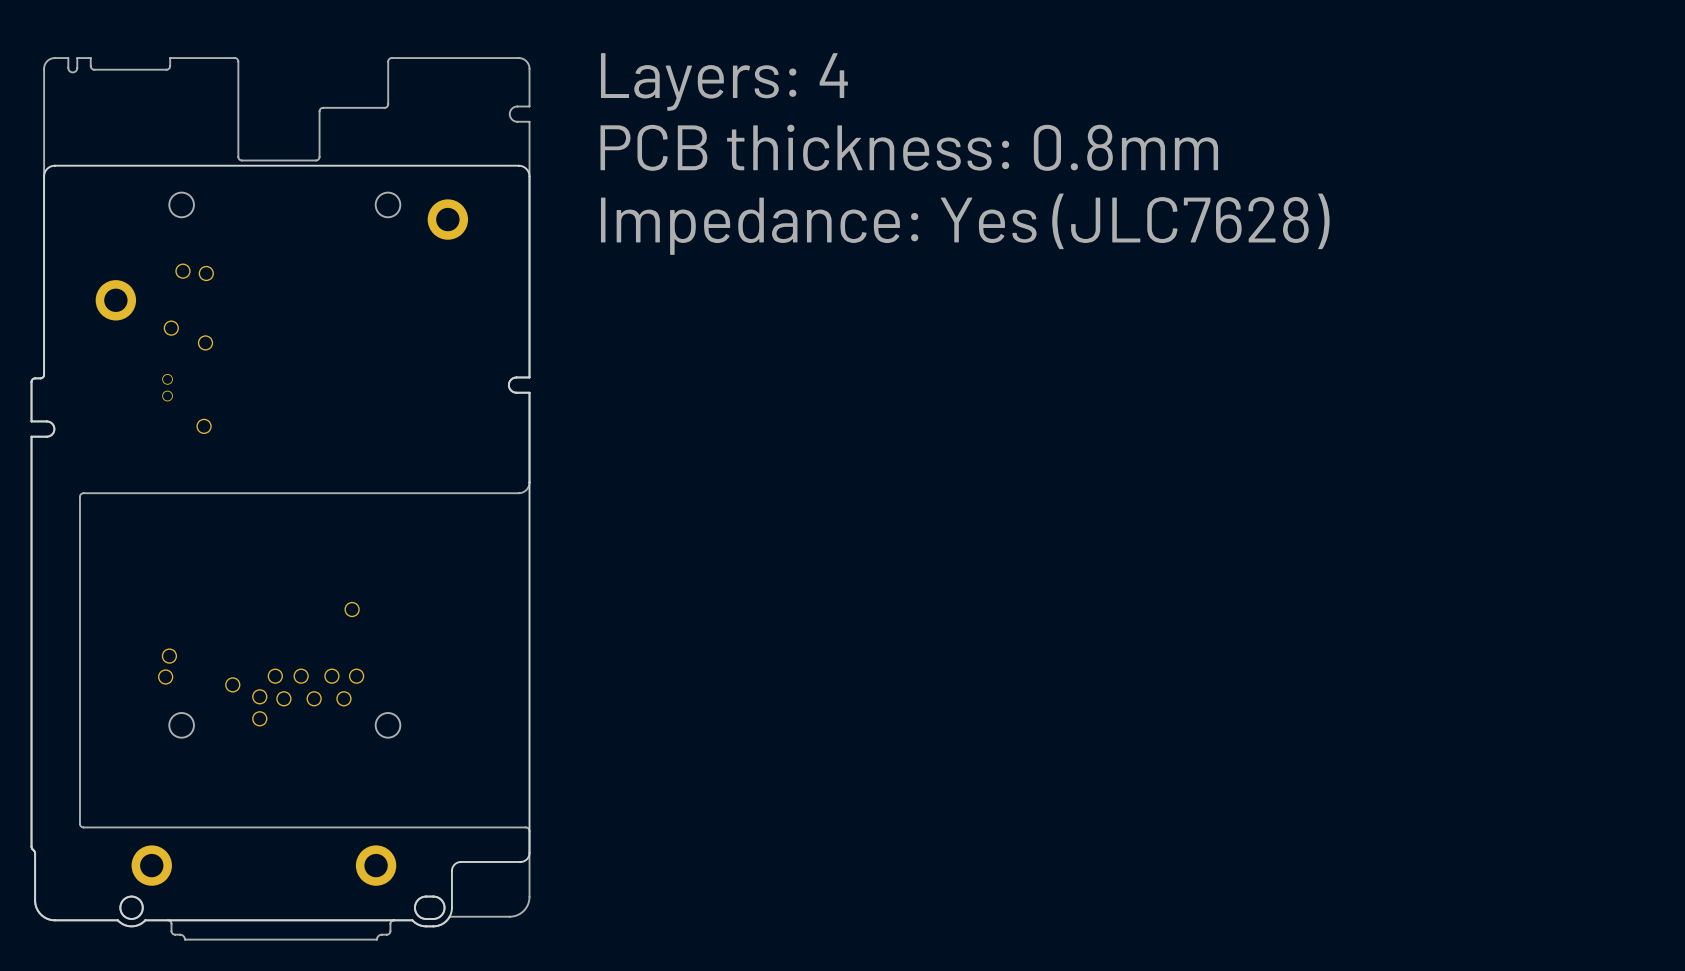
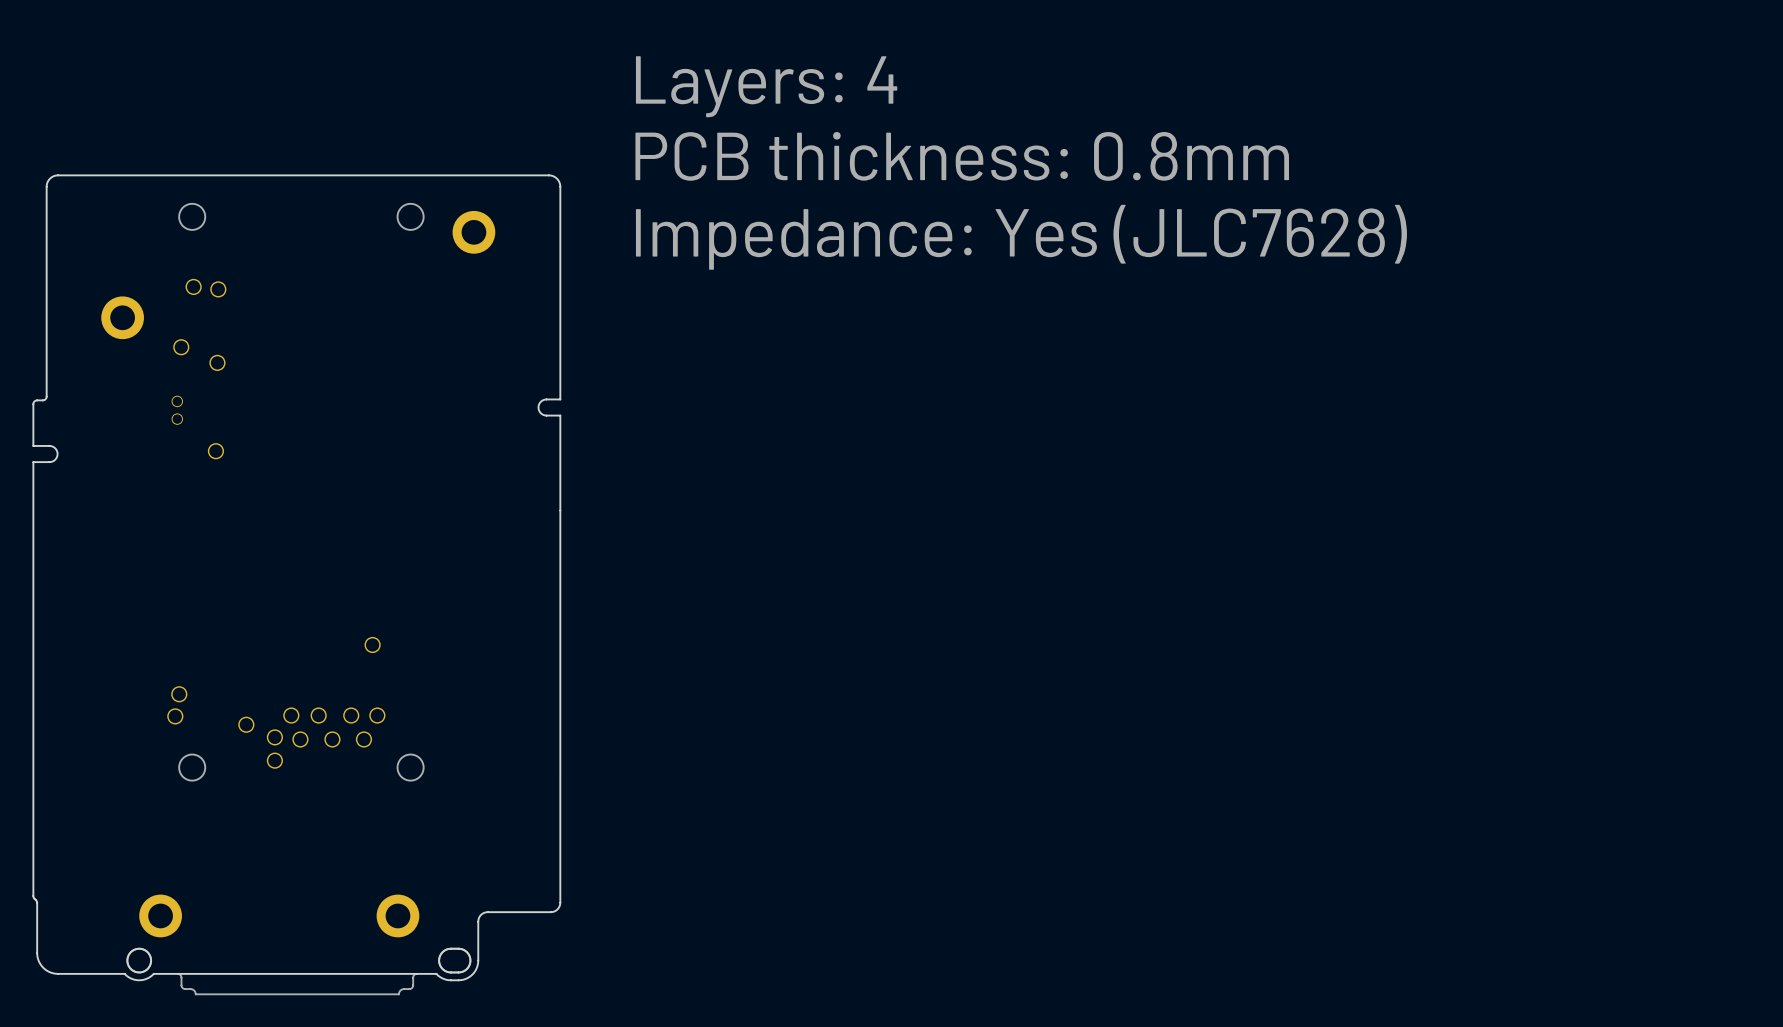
line: (54, 58) (68, 58) (68, 69) (72, 72) (76, 69) (77, 58) (90, 58) (90, 67) (94, 69) (166, 69) (170, 66) (170, 58) (236, 58) (238, 61) (238, 156) (241, 160) (317, 159) (319, 156) (320, 109) (386, 107) (388, 61) (390, 58) (518, 58) (528, 63) (529, 106) (514, 106) (509, 114) (514, 121) (529, 121) (529, 377) (513, 378) (508, 385) (513, 392) (529, 392) (529, 482) (526, 490) (518, 493) (83, 493) (79, 496) (81, 826) (526, 827) (529, 831) (529, 899) (525, 909) (518, 914) (509, 916) (449, 916) (442, 923) (433, 926) (420, 925) (412, 920) (145, 920) (140, 924) (131, 926) (123, 924) (117, 920) (50, 919) (42, 916) (37, 909) (35, 900) (35, 852) (31, 846) (31, 436) (49, 436) (54, 429) (49, 421) (31, 421) (31, 381) (33, 378) (41, 378) (44, 375) (44, 68) (47, 61) (54, 58) -> none

